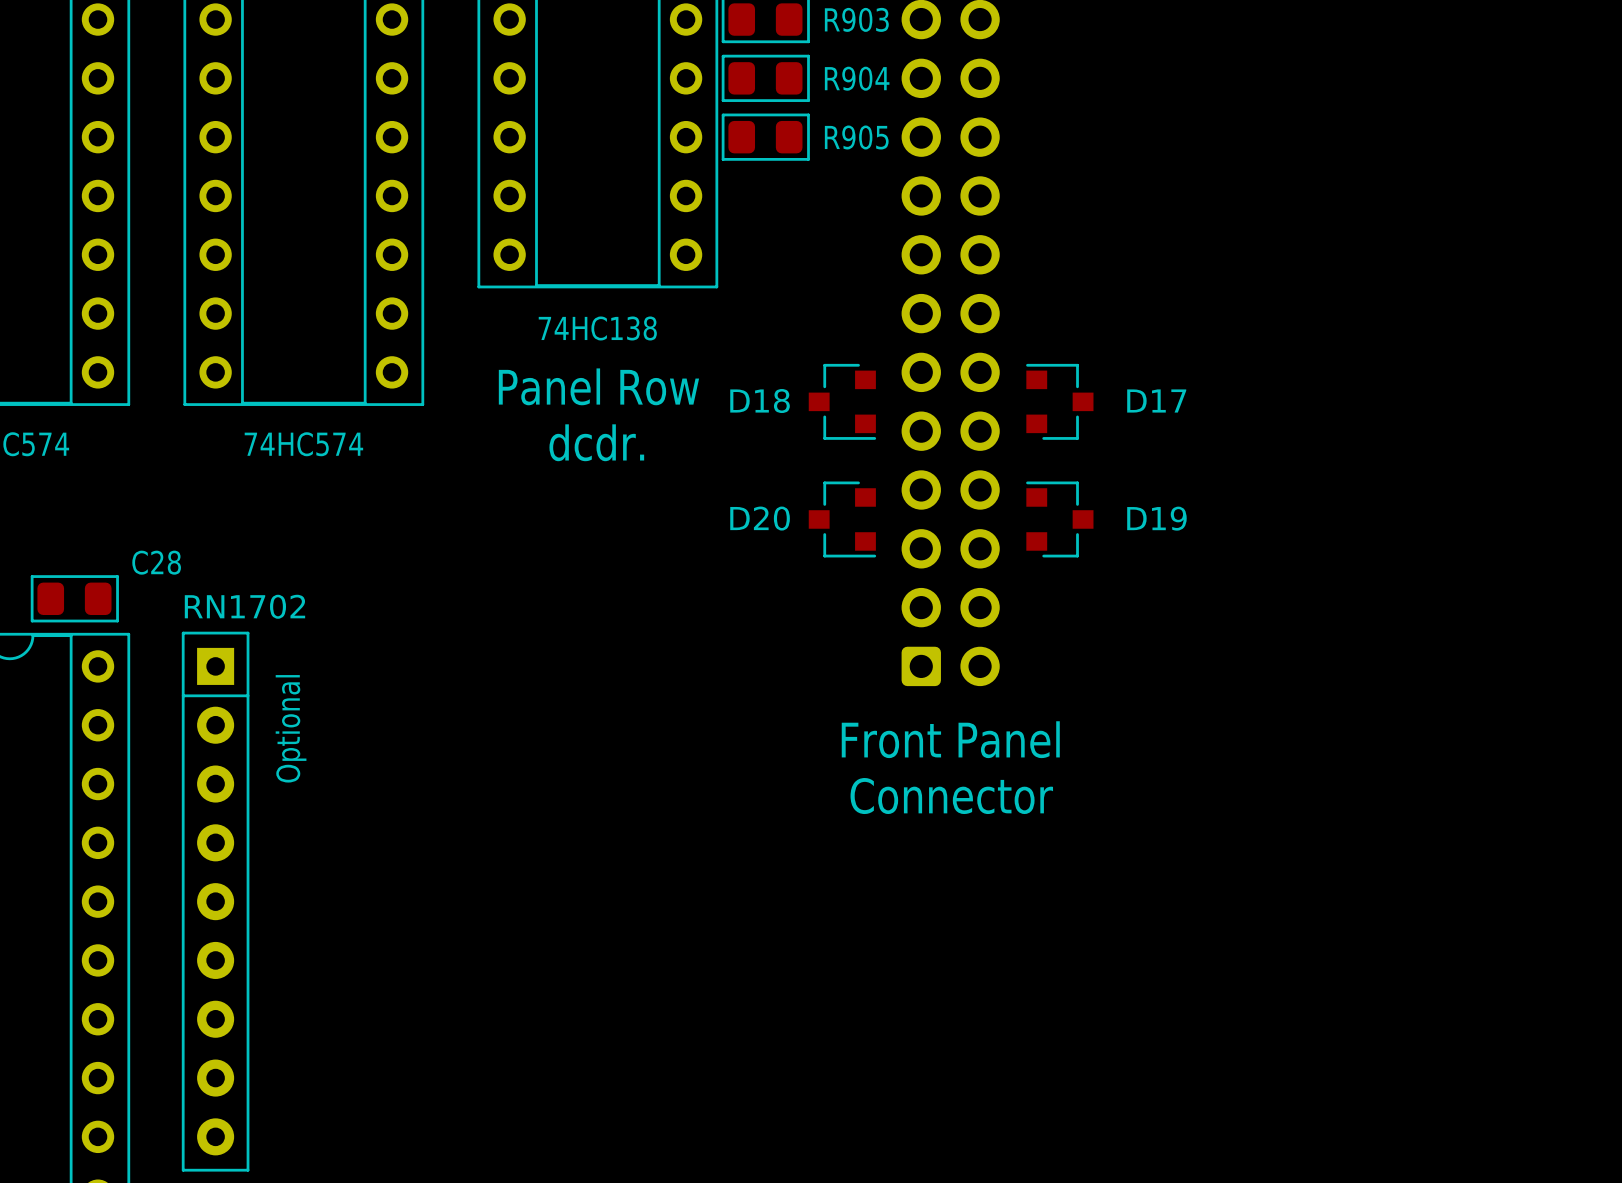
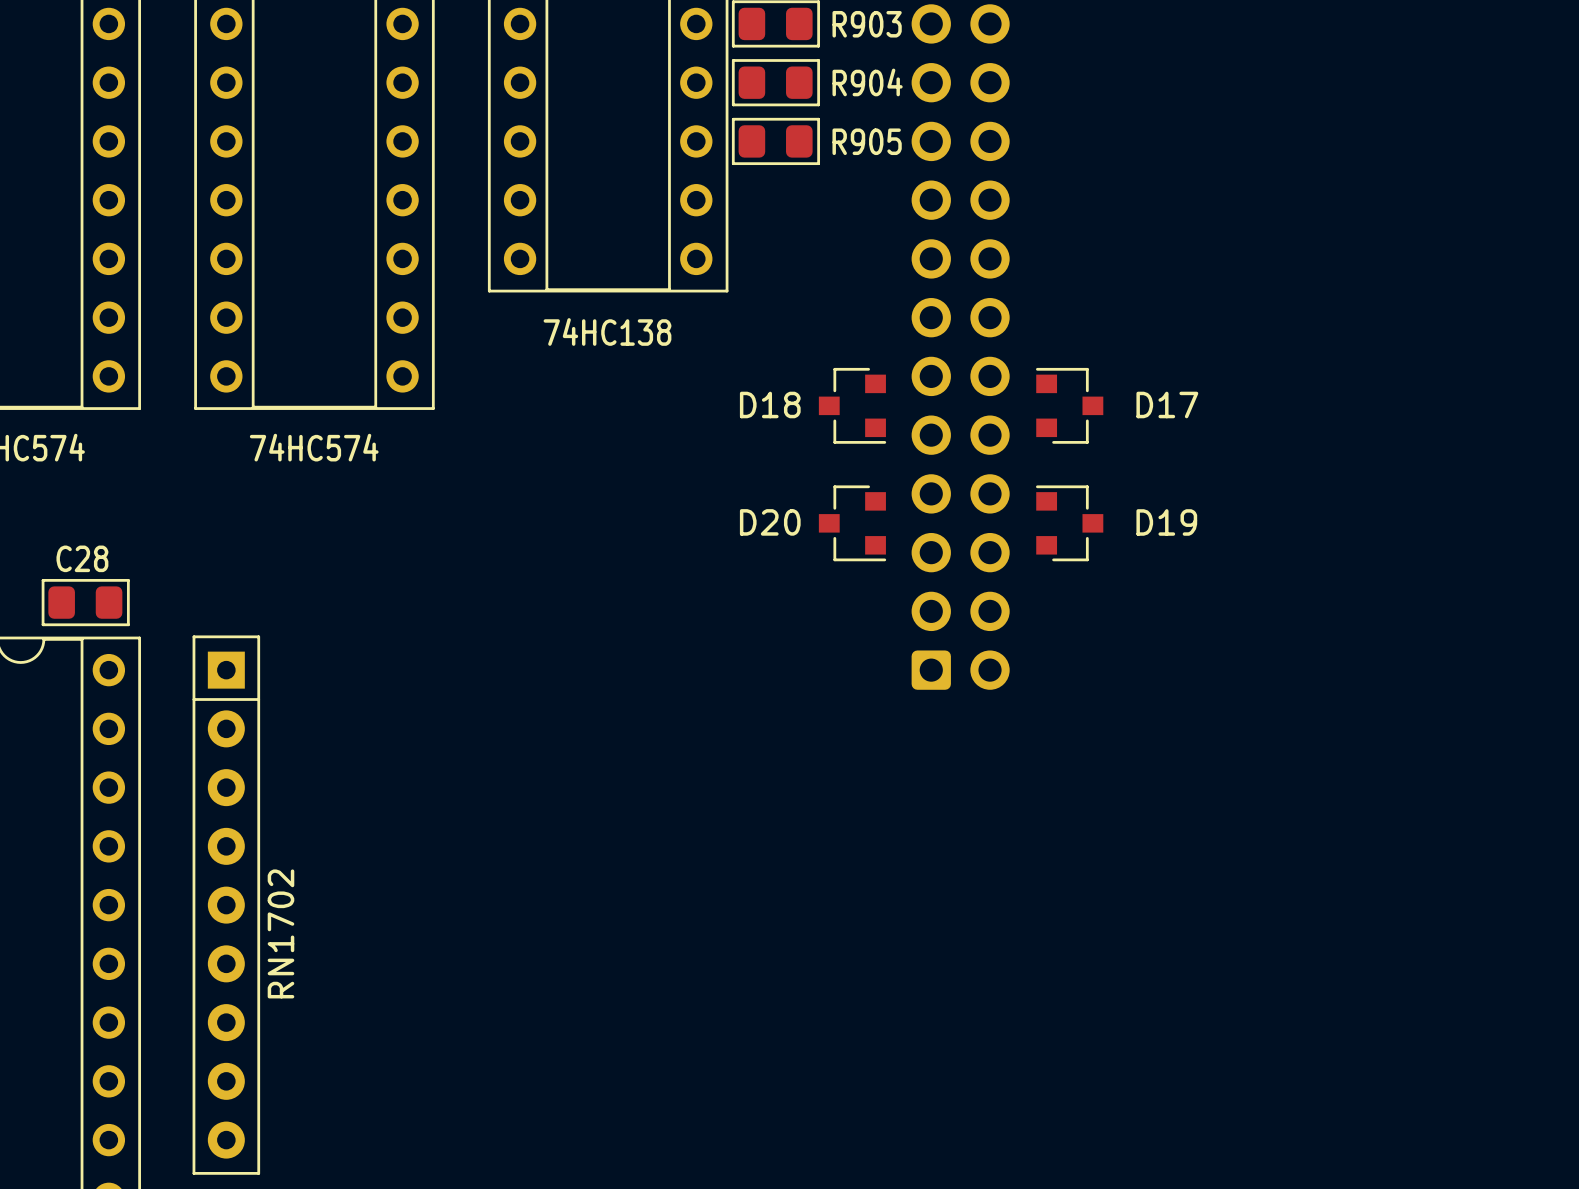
text: Panel Row (598, 386) -> none
text: dcdr. (596, 442) -> none
C28 name position: C28 (156, 562) -> C28 (82, 558)
RN1702 name rotation: 0° (244, 606) -> 90° counterclockwise (280, 933)
RN1702 name position: RN1702 (244, 606) -> RN1702 (280, 933)
text: Optional (291, 728) -> none
text: Front Panel (950, 739) -> none
text: Connector (951, 796) -> none

